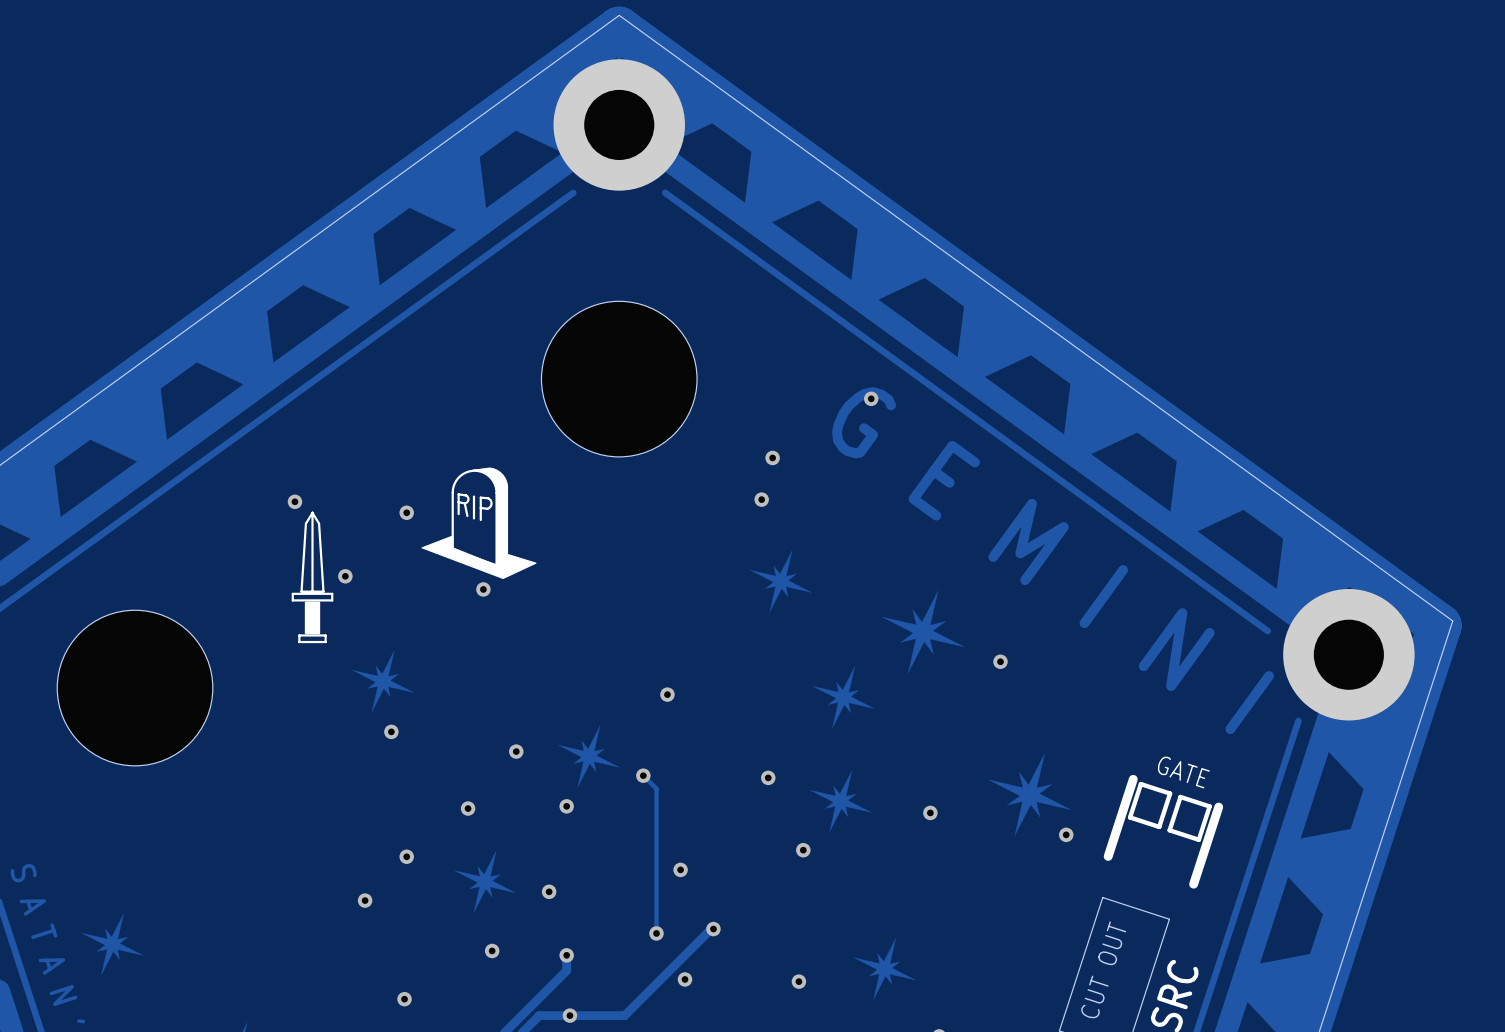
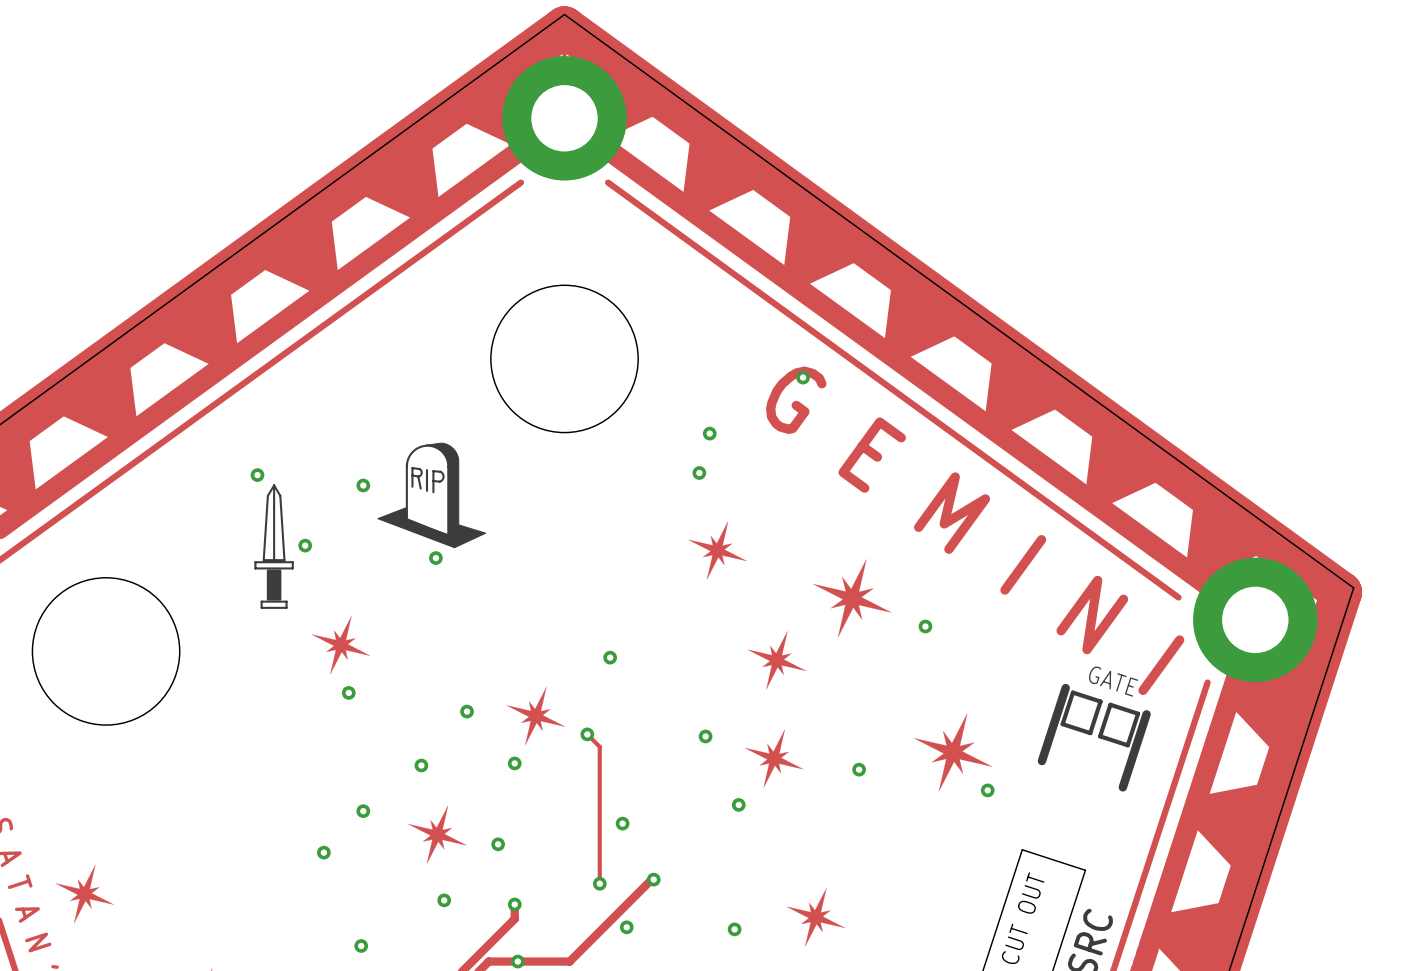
text position: GATE (1183, 772) -> GATE (1113, 681)
line: (1133, 779) (1108, 856) -> (1065, 688) (1041, 761)
line: (1140, 784) (1170, 793) (1159, 826) (1130, 817) (1140, 784) -> (1072, 692) (1100, 701) (1090, 733) (1062, 724) (1072, 692)
line: (1180, 796) (1169, 830) (1198, 839) (1209, 806) (1180, 796) -> (1110, 704) (1100, 736) (1127, 745) (1138, 713) (1110, 704)
line: (1218, 807) (1193, 884) -> (1146, 714) (1122, 787)

